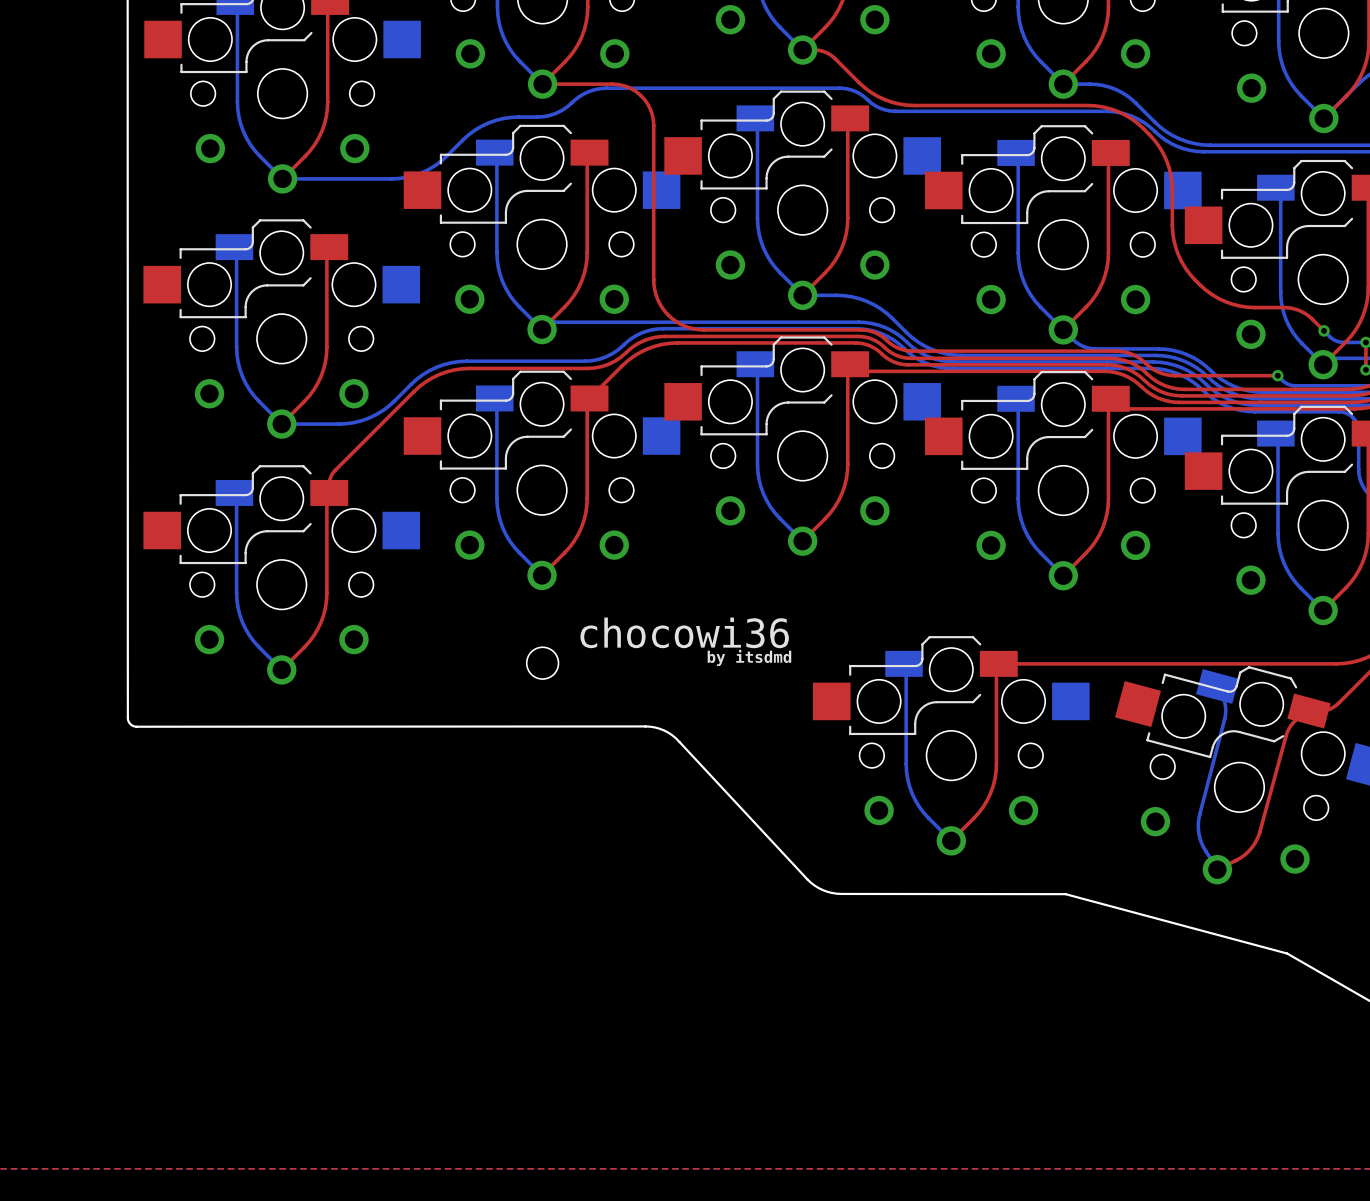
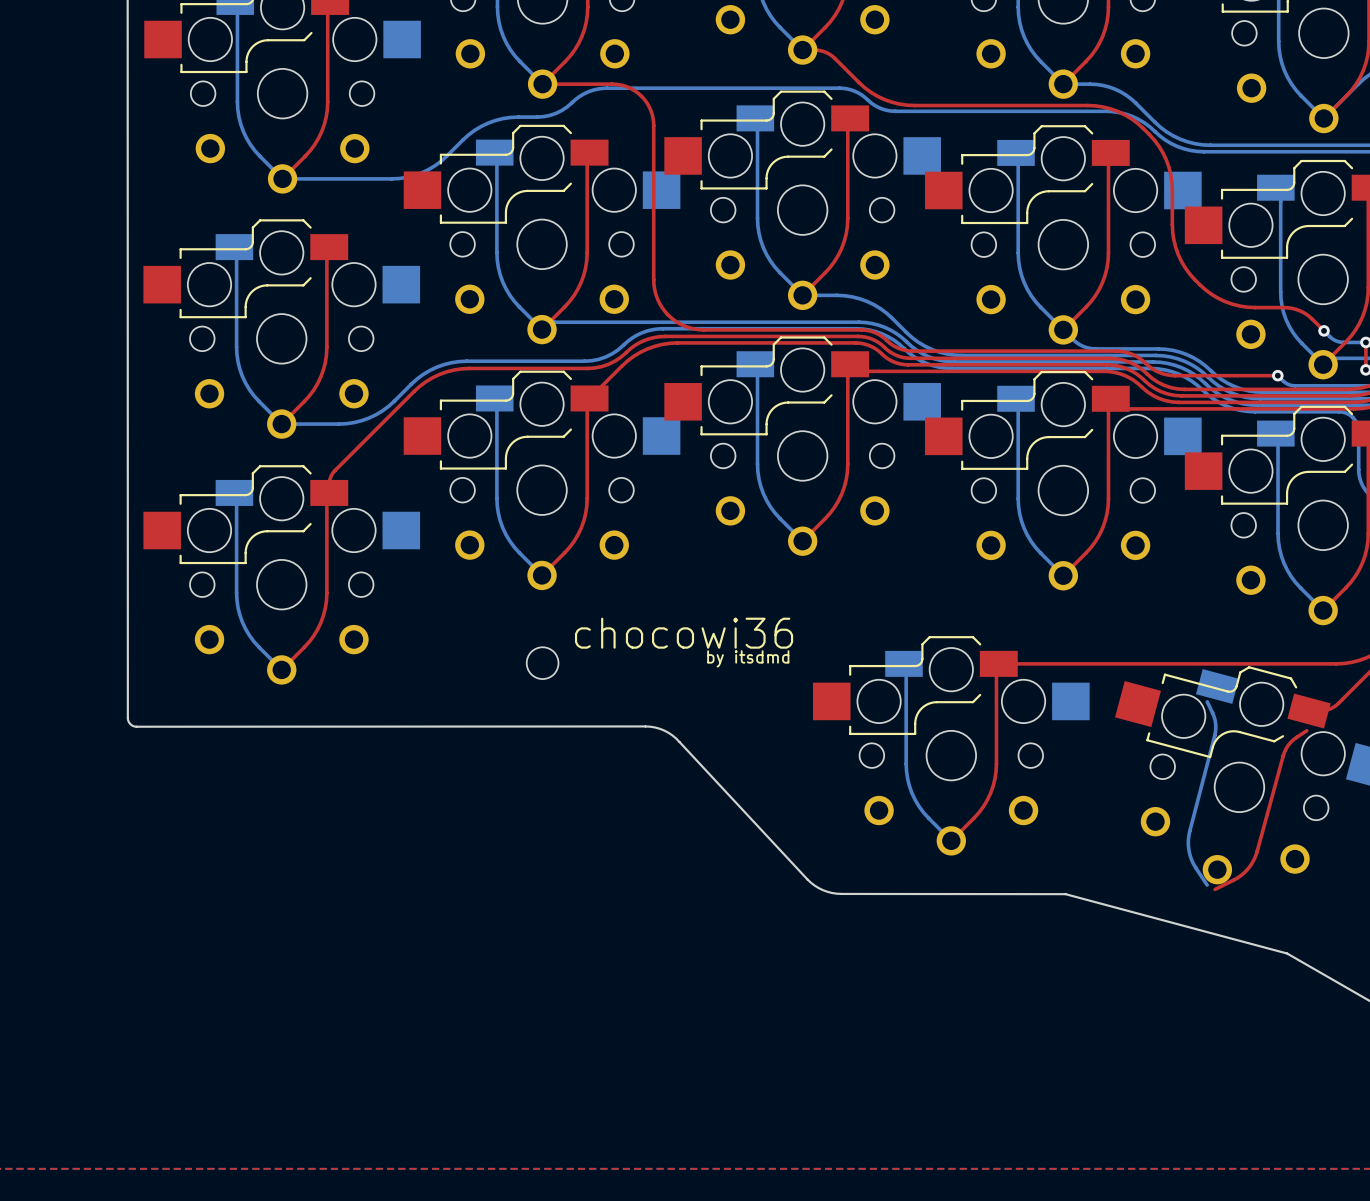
bottom track: (1217, 685) (1225, 703) (1225, 715) (1198, 823) (1201, 842) (1217, 868) -> (1207, 701) (1215, 720) (1215, 731) (1188, 840) (1191, 859) (1207, 885)
top track: (1309, 710) (1293, 722) (1287, 732) (1256, 840) (1244, 855) (1217, 869) -> (1306, 730) (1290, 742) (1284, 752) (1253, 860) (1241, 875) (1215, 889)

